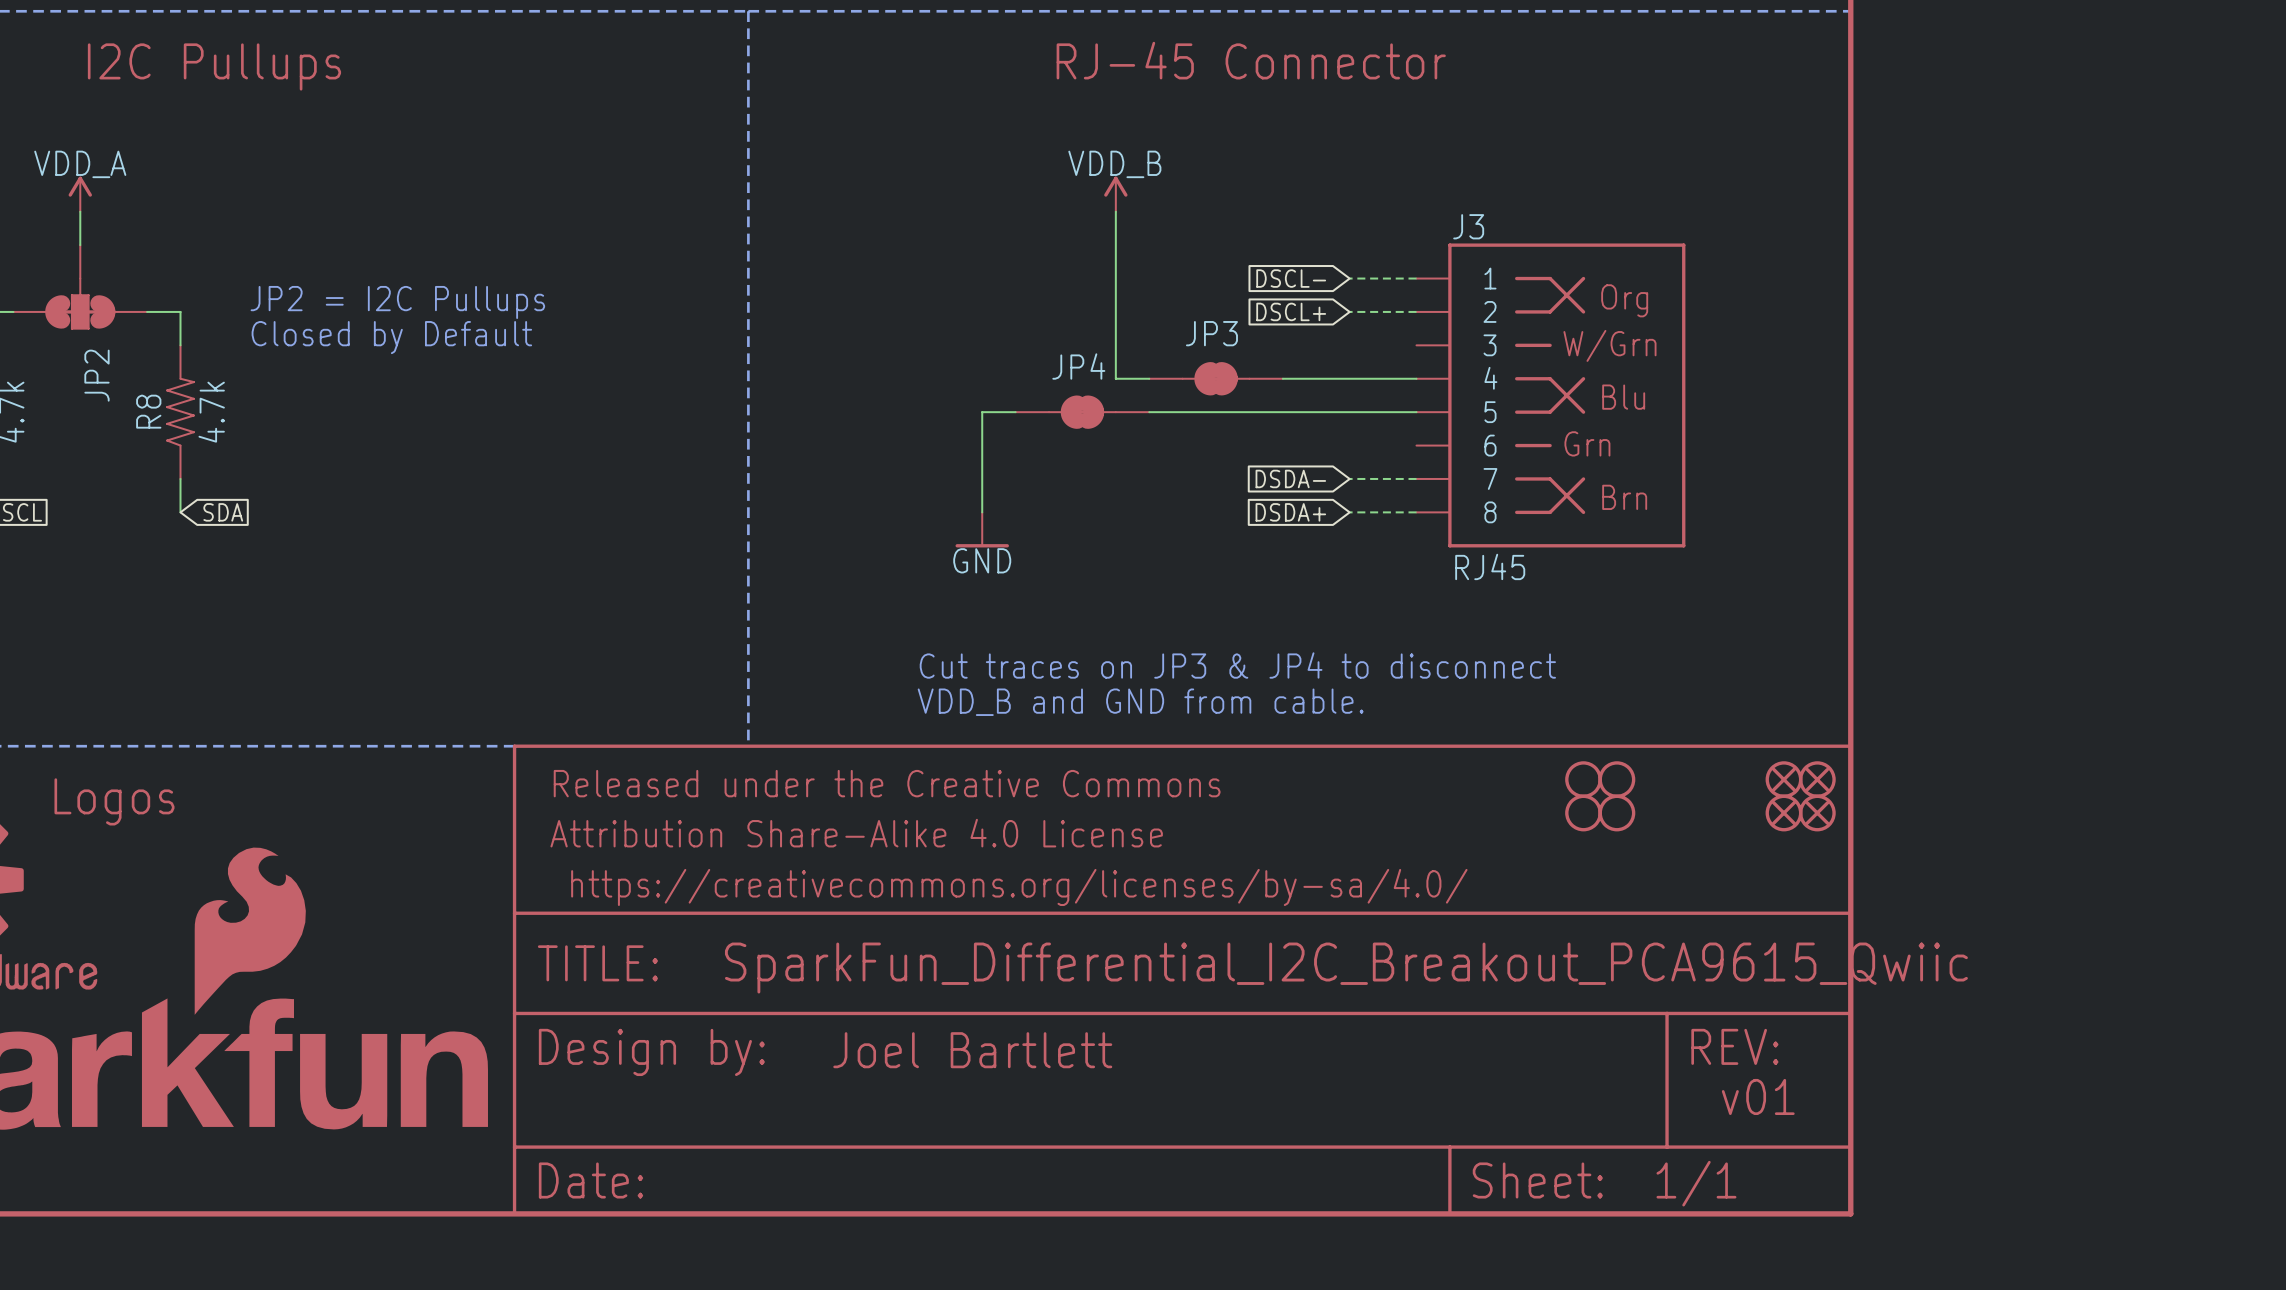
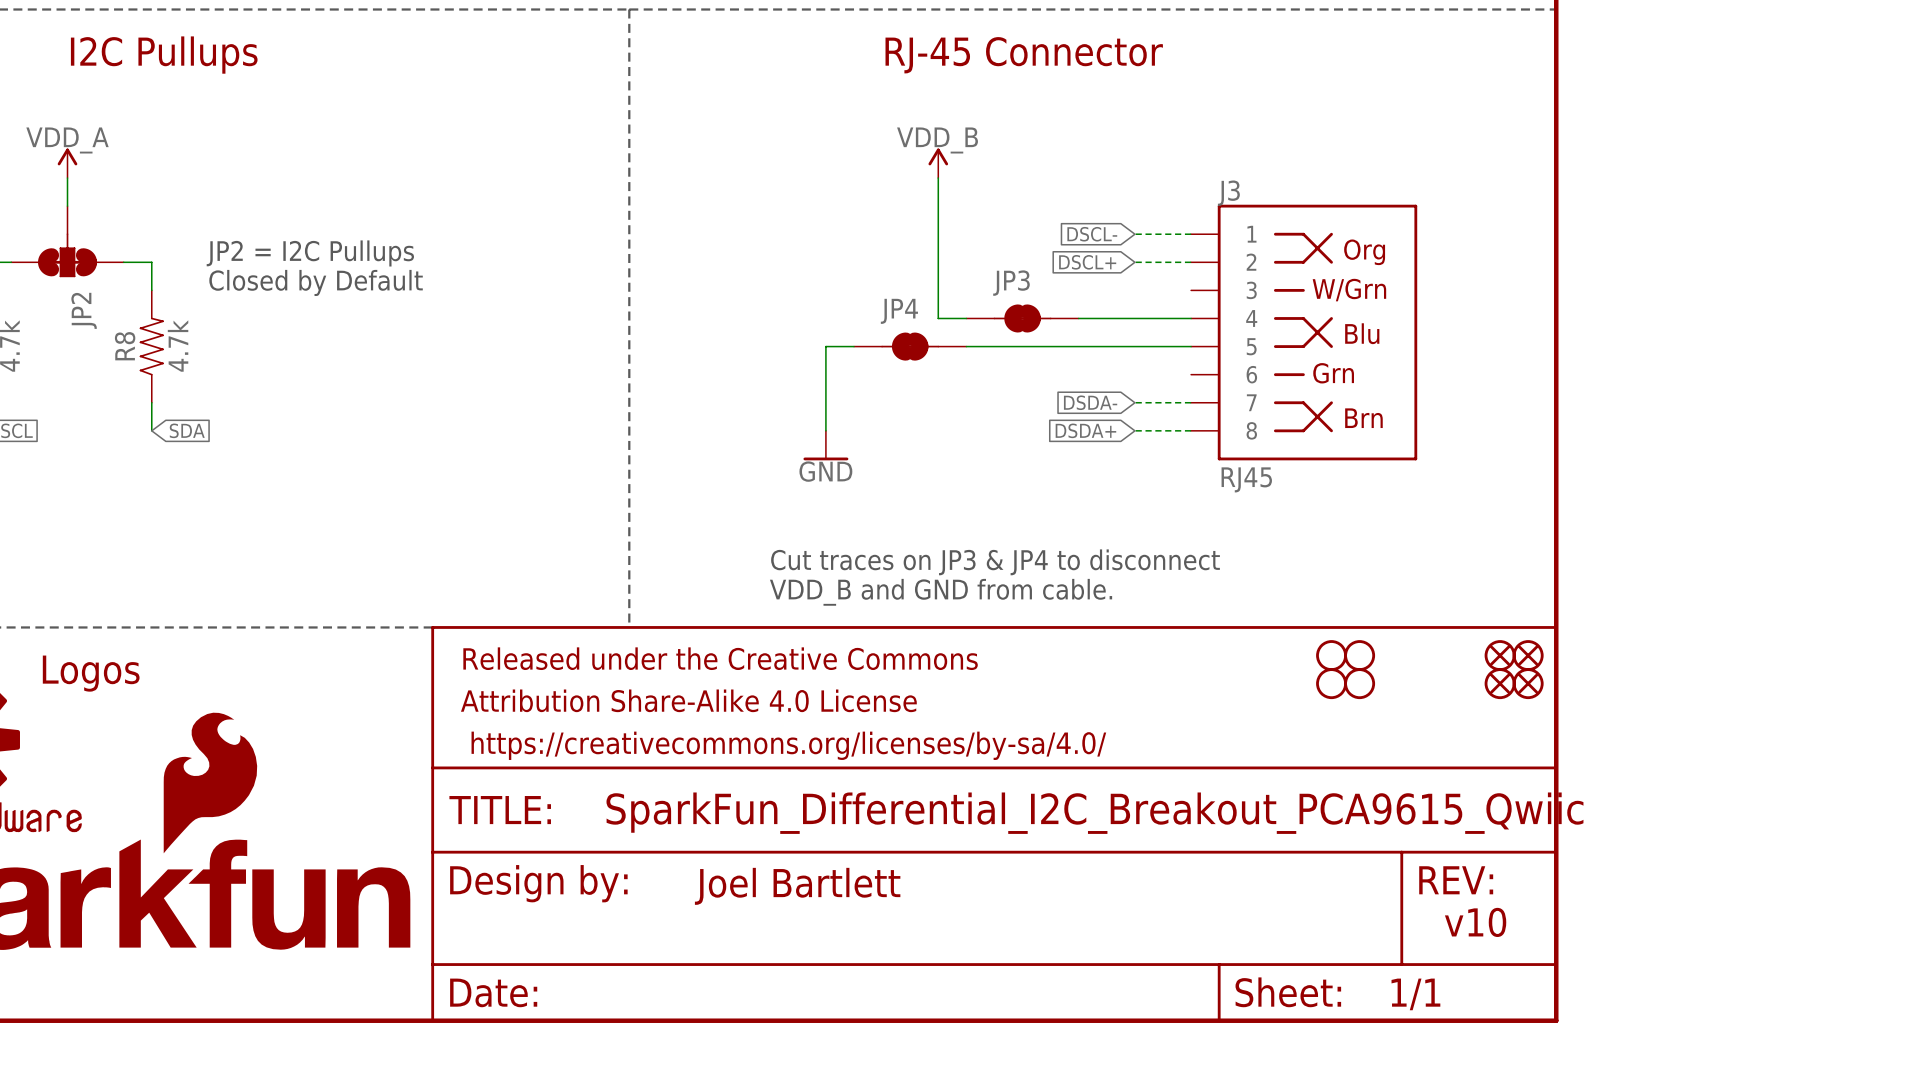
text: v01 (1758, 1096) -> v10 (1475, 922)

